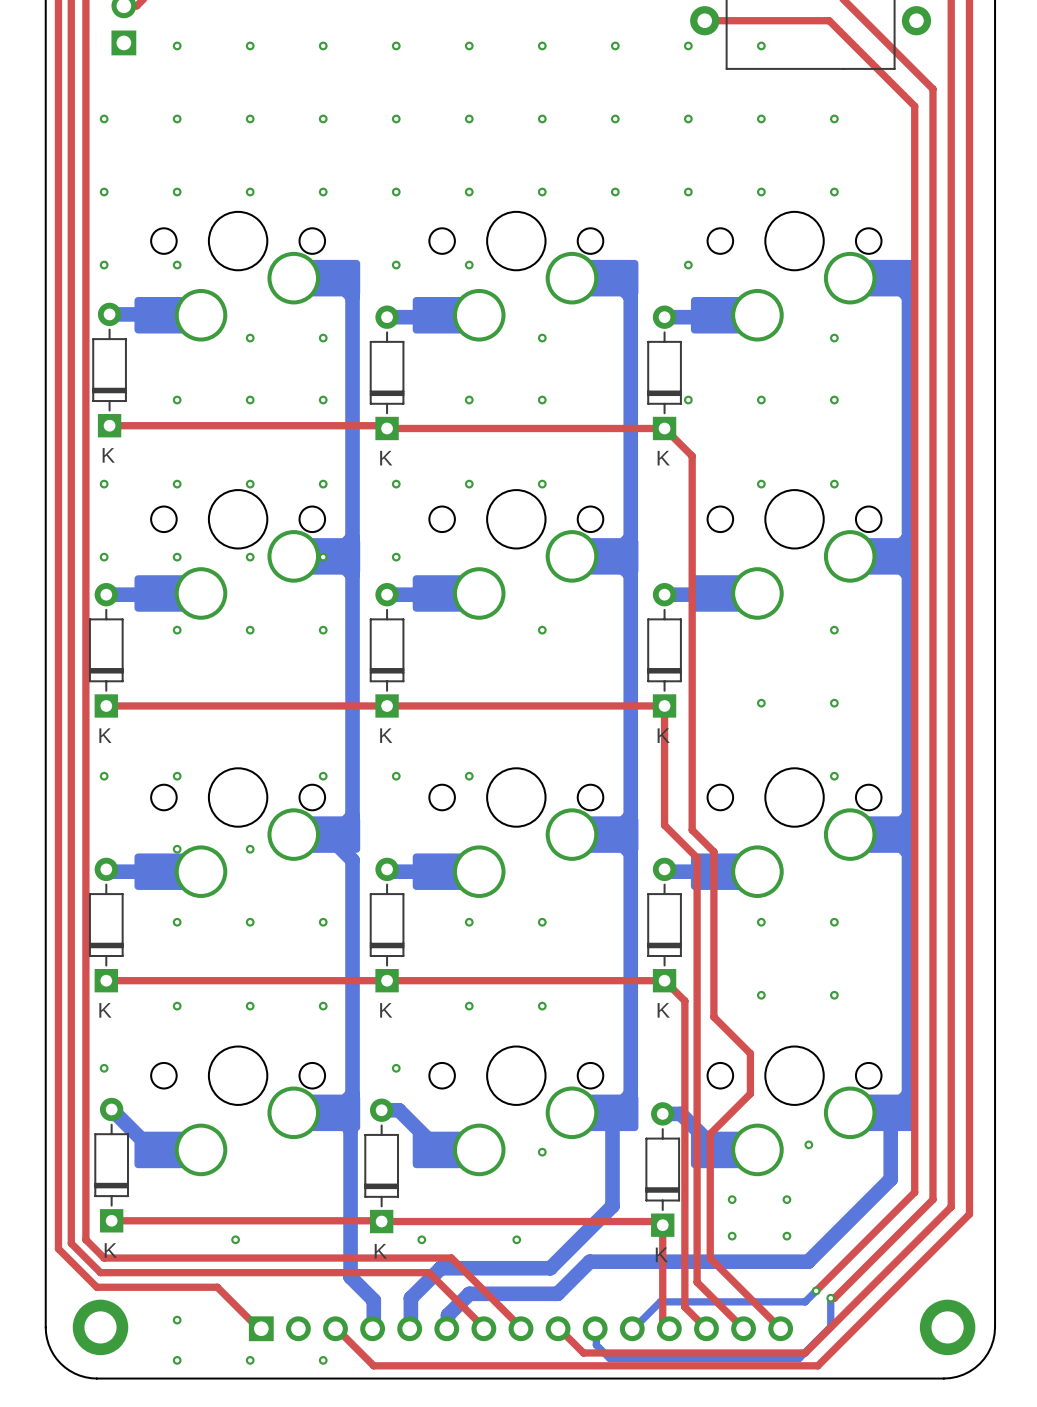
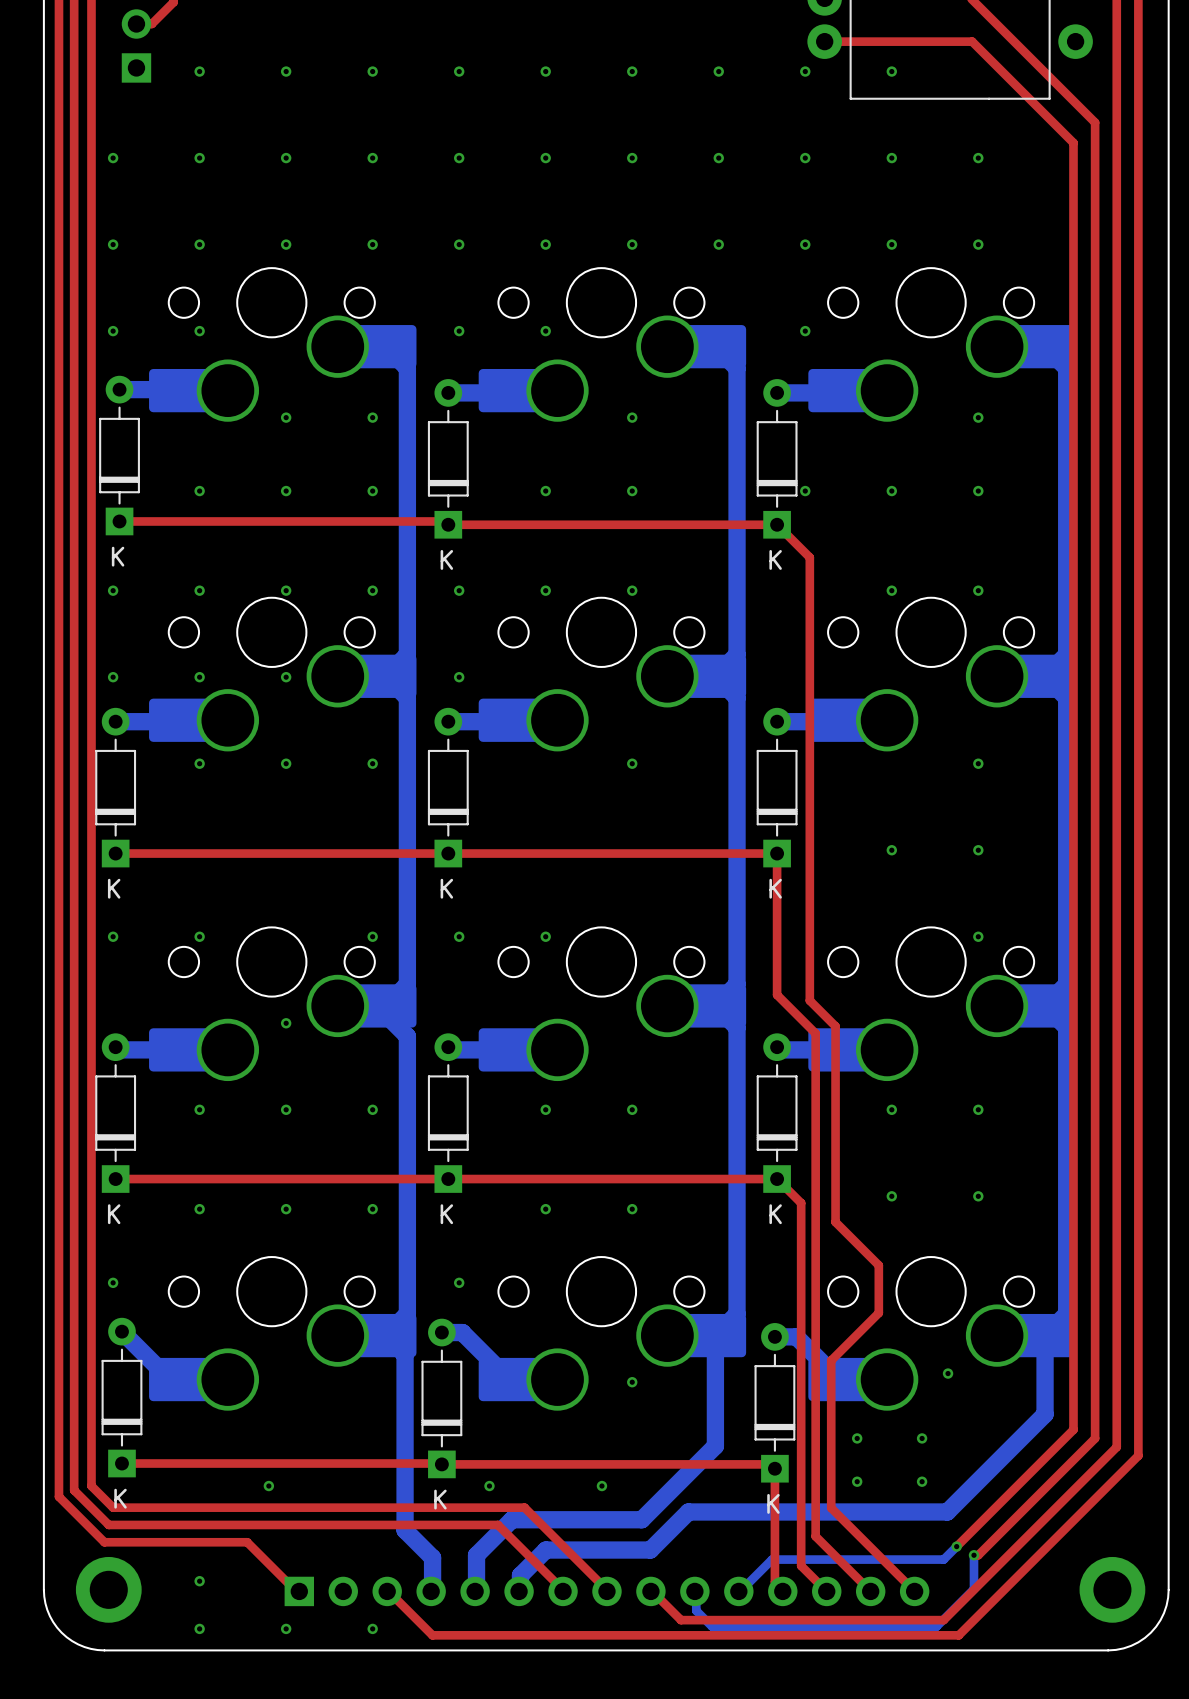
via: (323, 557) -> none
via: (177, 849) -> none

